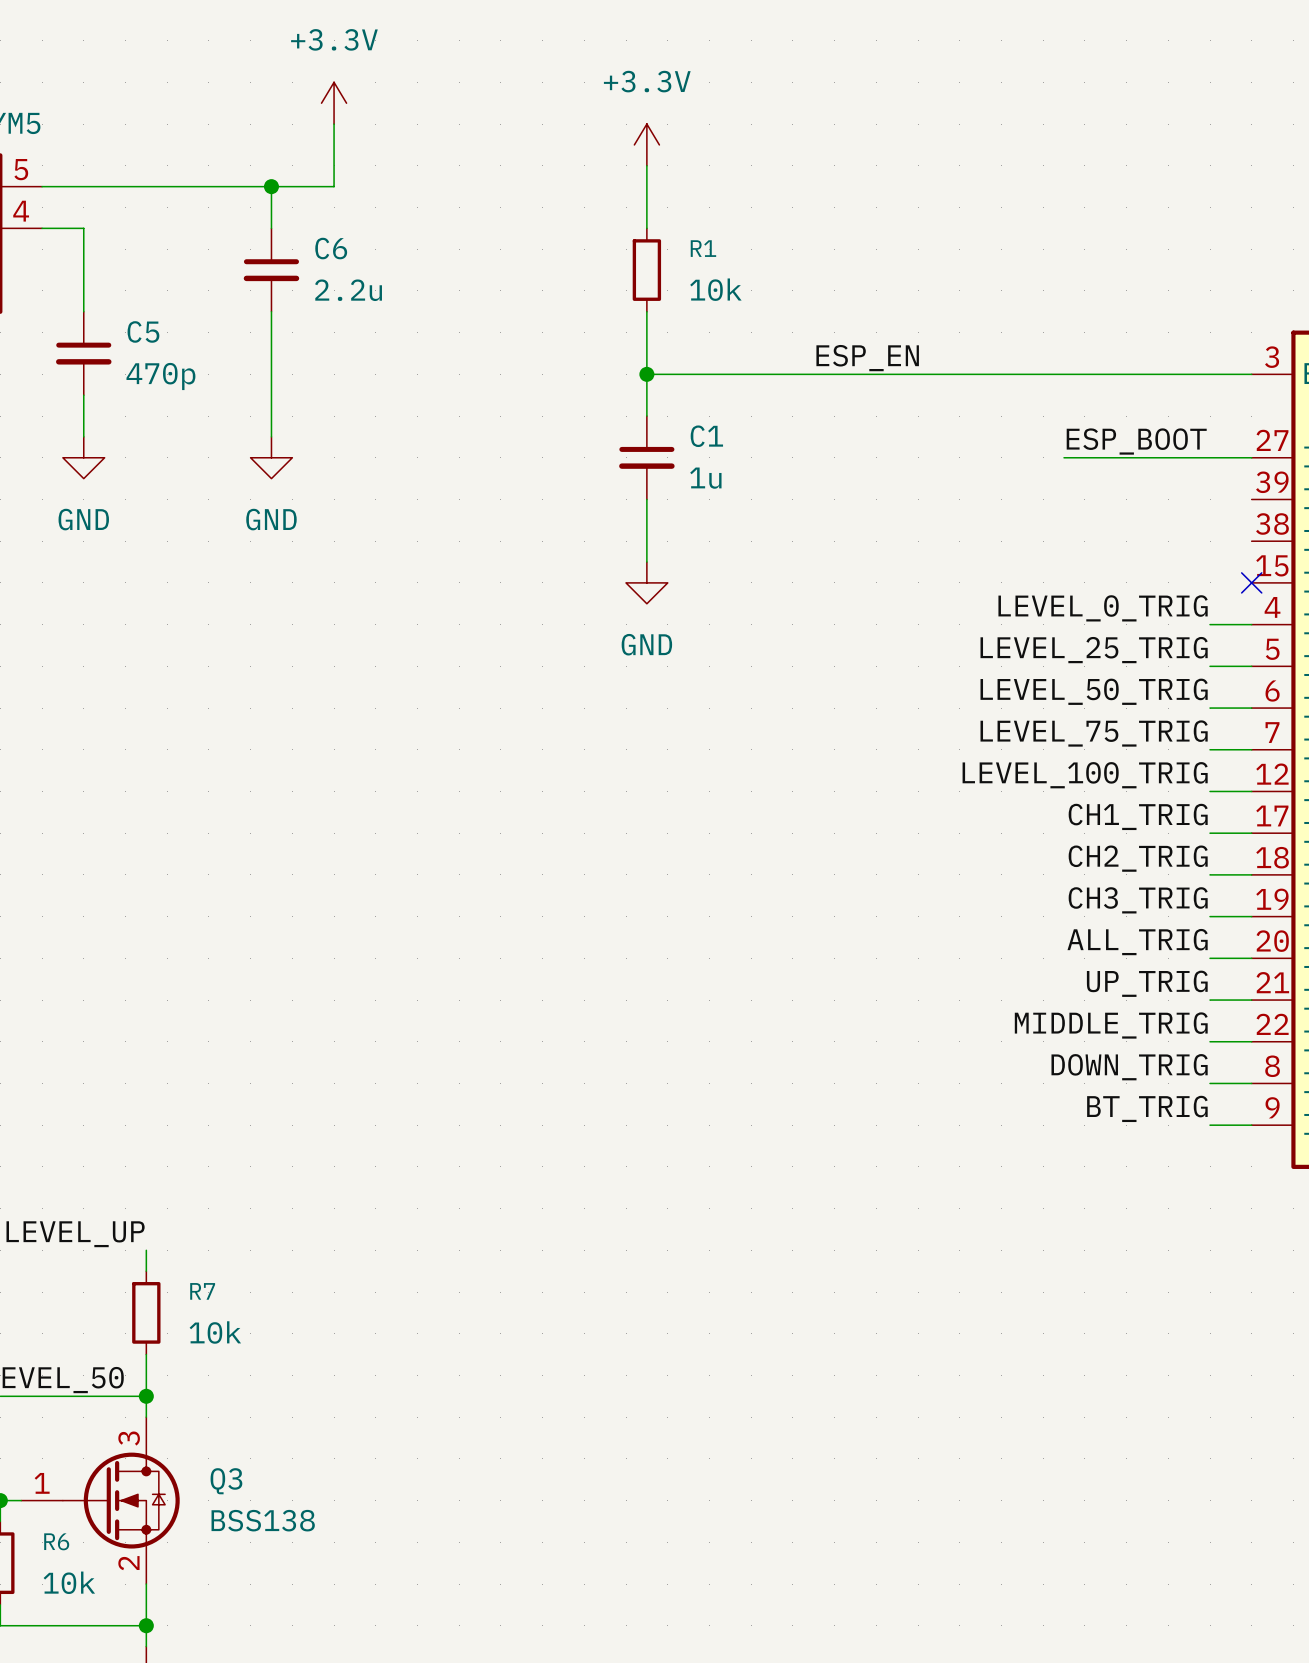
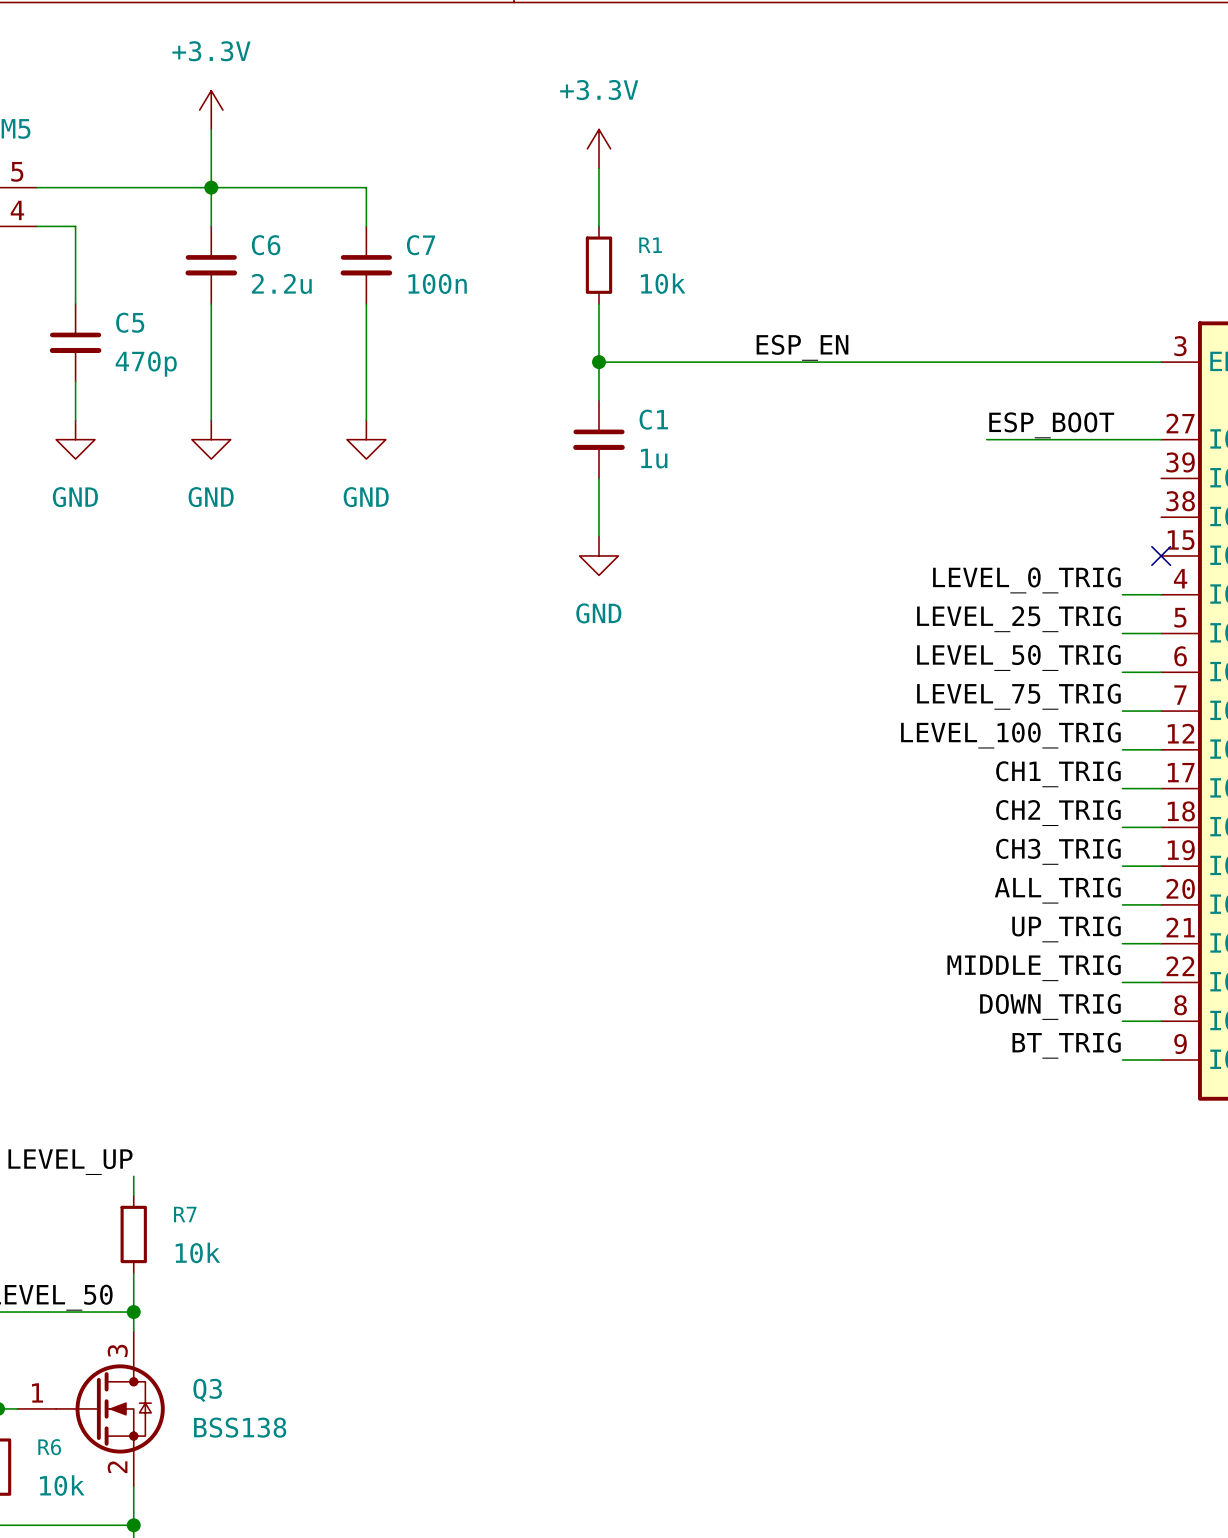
power symbol position: +3.3V (334, 103) -> +3.3V (211, 110)
wire: none -> (211, 129) (211, 226)
wire: (334, 124) (334, 186) -> (366, 226) (366, 187) (308, 187)
wire: (271, 186) (271, 228) -> none
junction position: (271, 186) -> (211, 187)
C6 position: (271, 270) -> (211, 265)
C7: none -> 100n (366, 265)
wire: (271, 311) (271, 436) -> (211, 303) (211, 420)
wire: none -> (366, 303) (366, 420)
power symbol position: GND (271, 457) -> GND (211, 439)
power symbol: none -> GND (366, 439)

